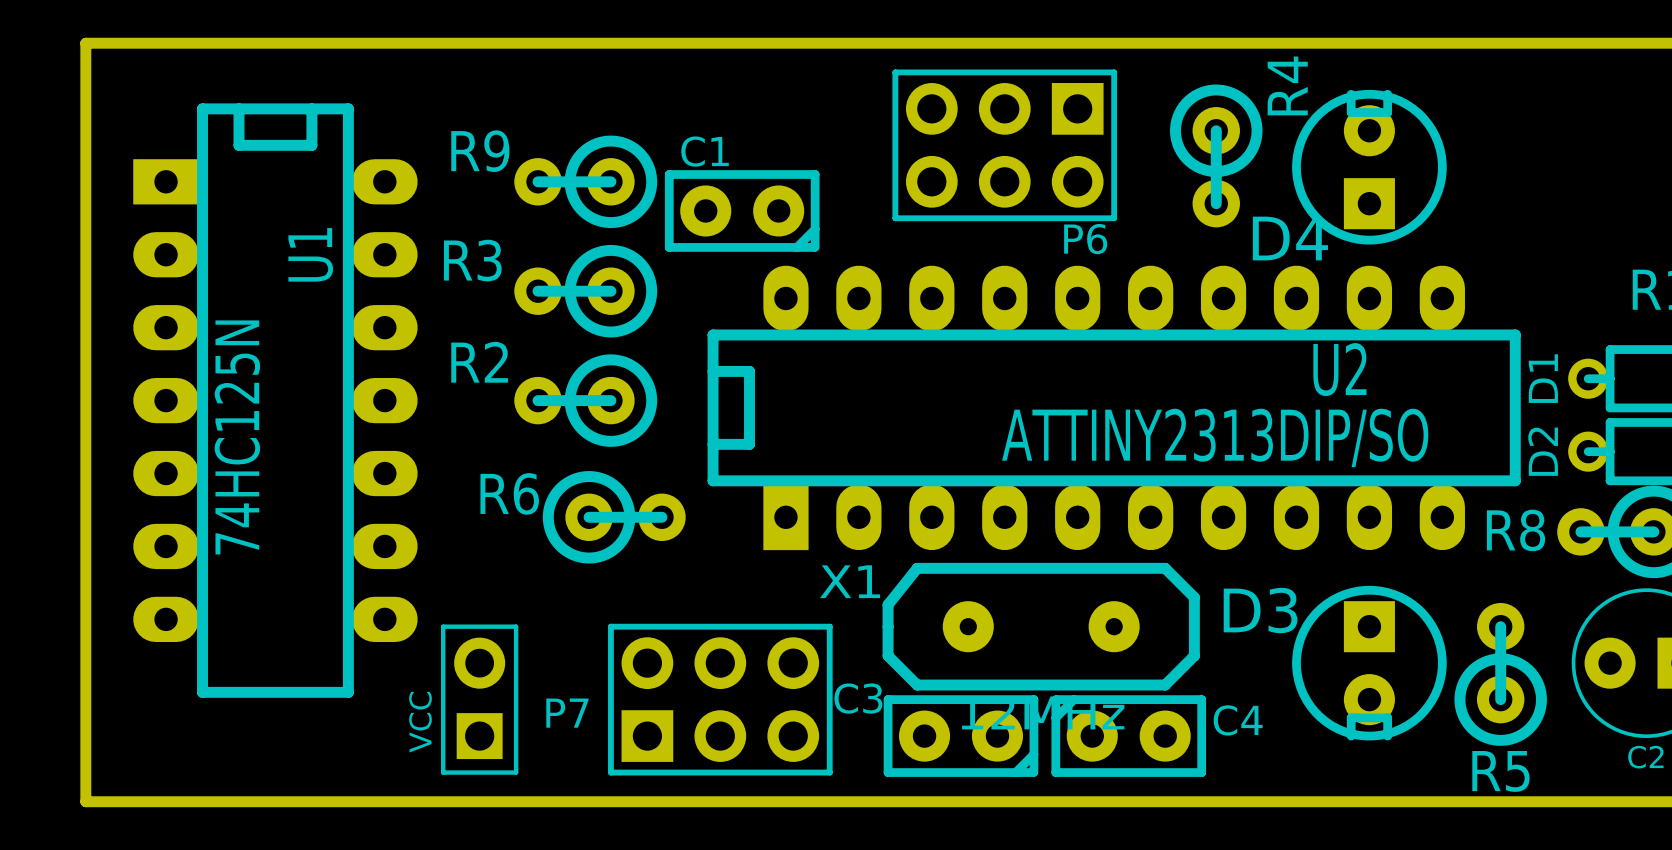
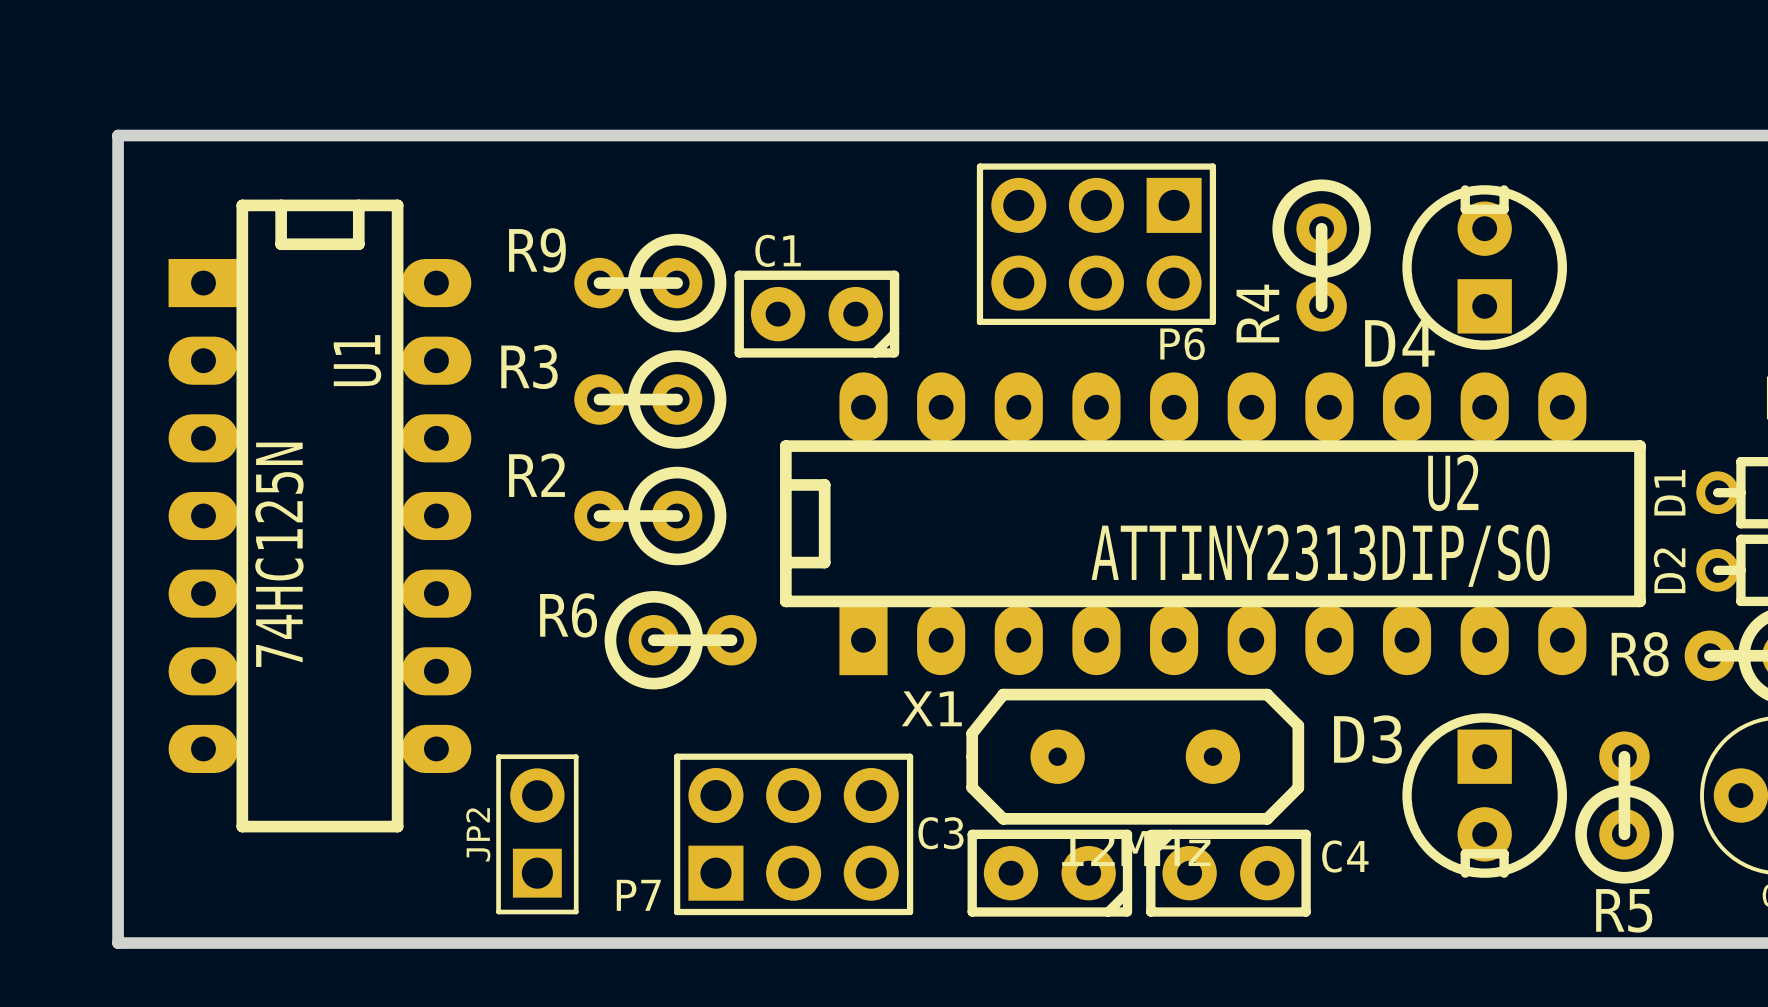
R4 name position: R4 (1287, 85) -> R4 (1257, 313)
P7 name position: P7 (567, 713) -> P7 (638, 895)
VCC name: VCC (420, 722) -> JP2 (478, 834)

